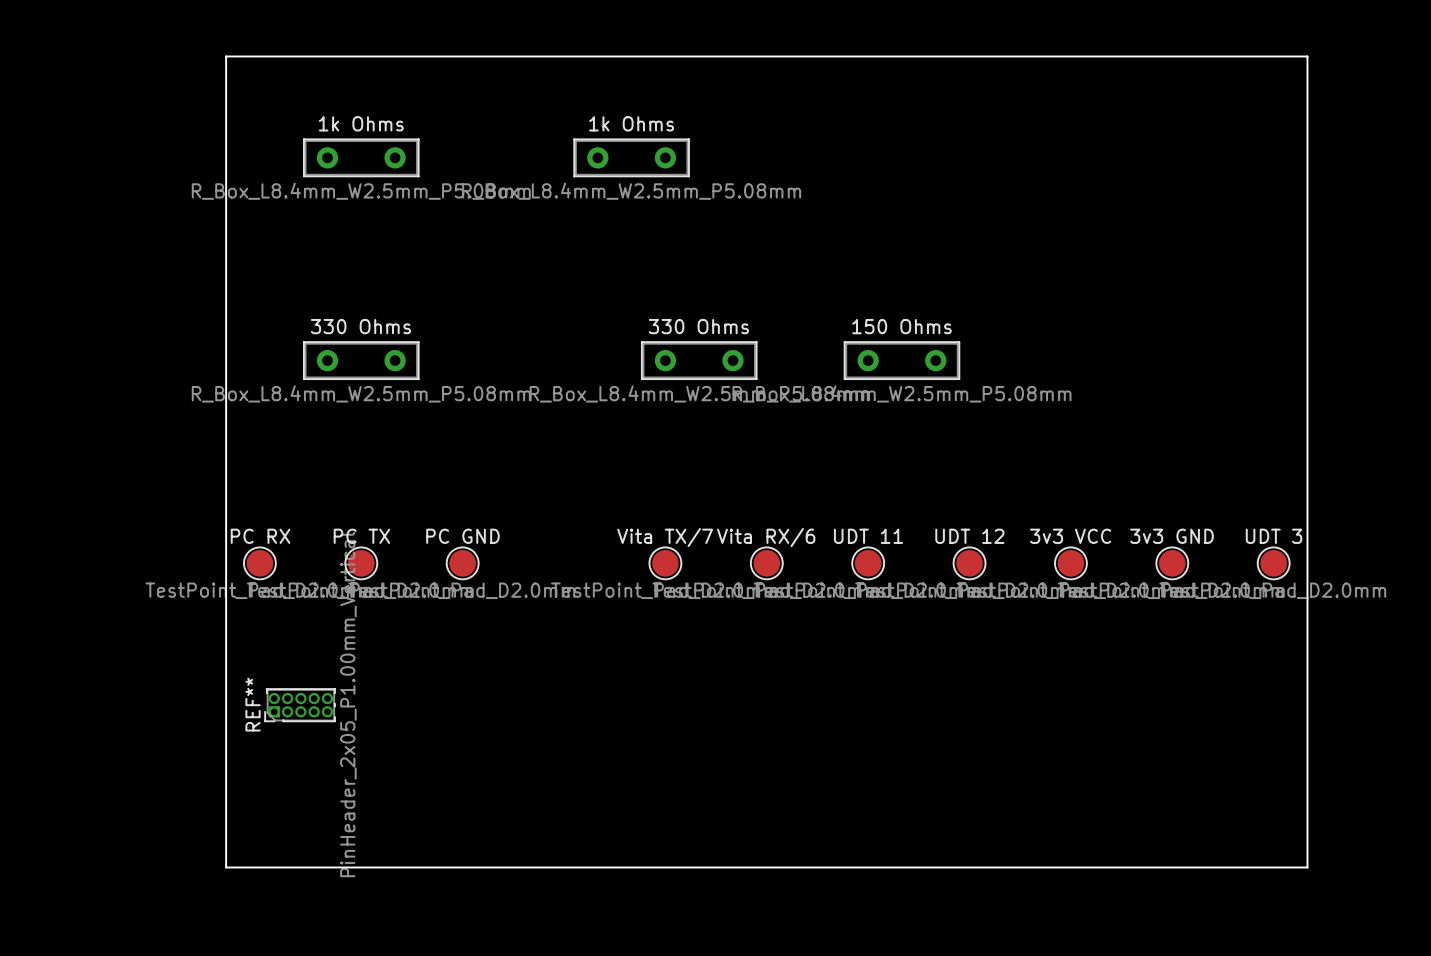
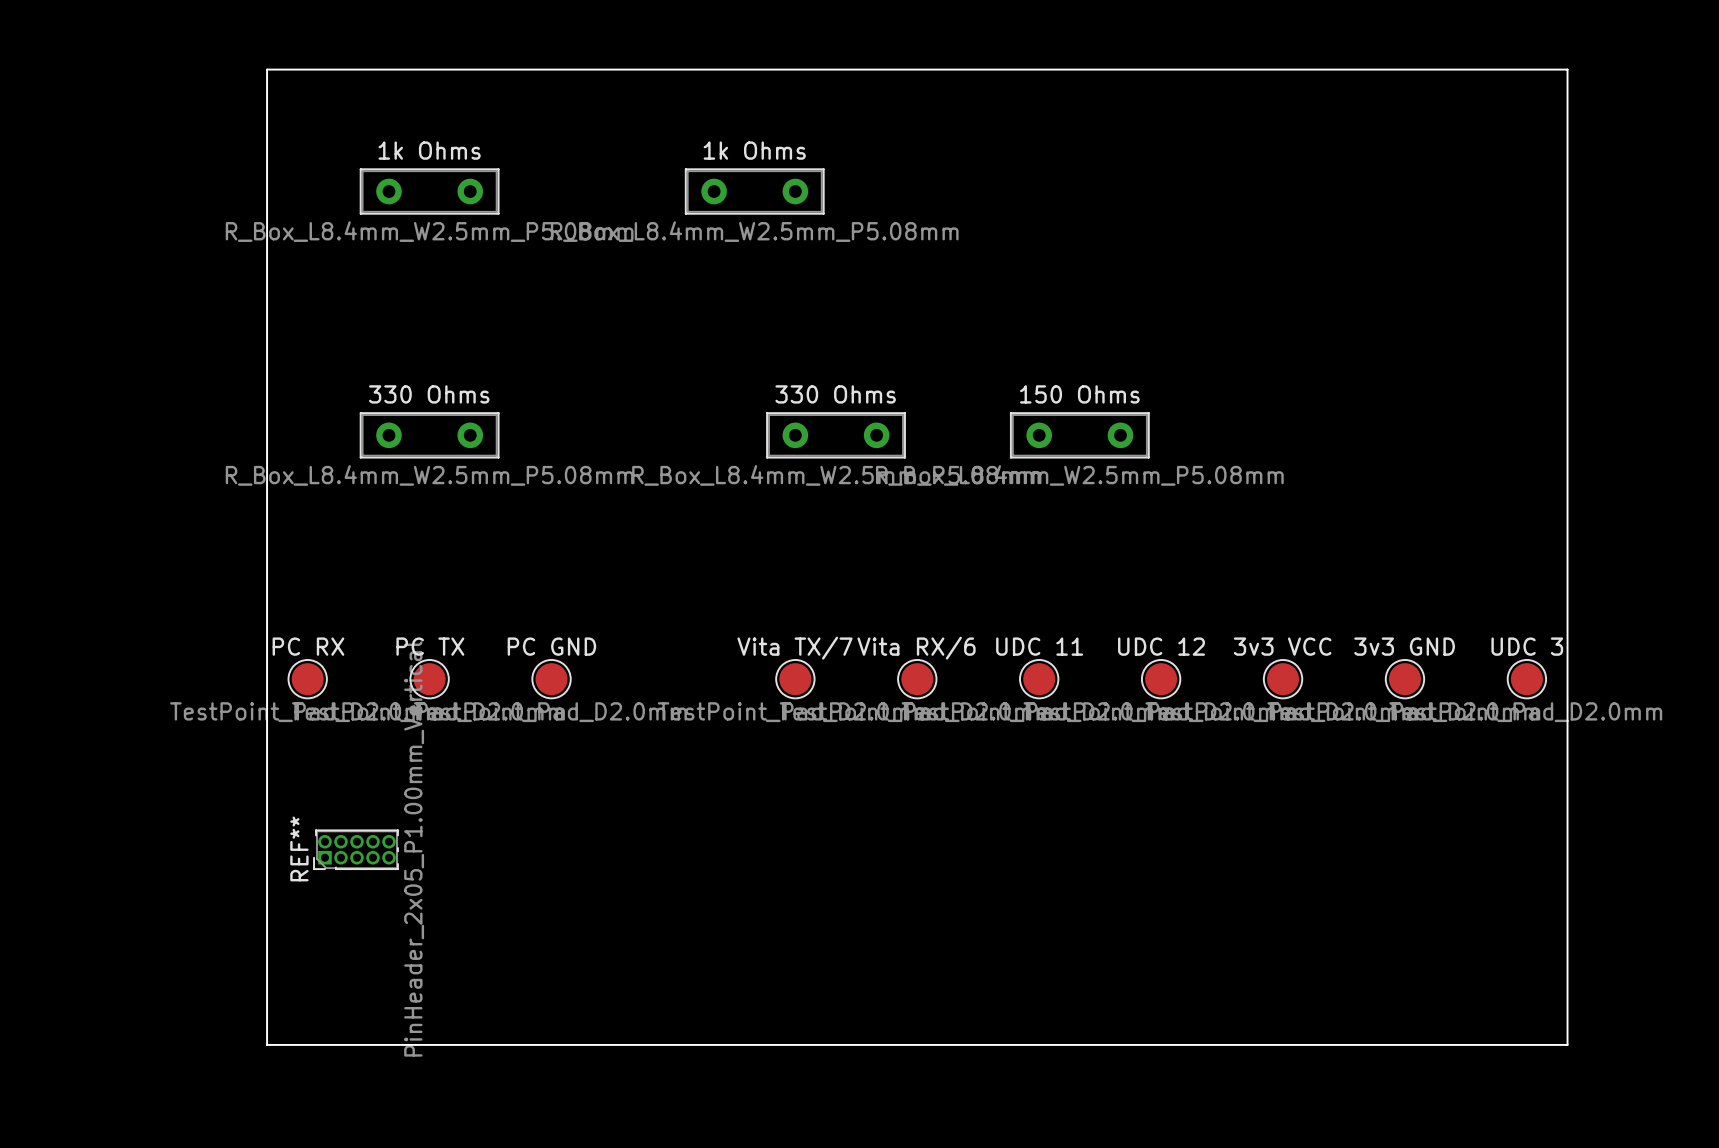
UDT 11 name: UDT 11 (868, 536) -> UDC 11 (1039, 646)
UDT 12 name: UDT 12 (969, 536) -> UDC 12 (1161, 646)
UDT 3 name: UDT 3 (1274, 536) -> UDC 3 (1527, 646)

